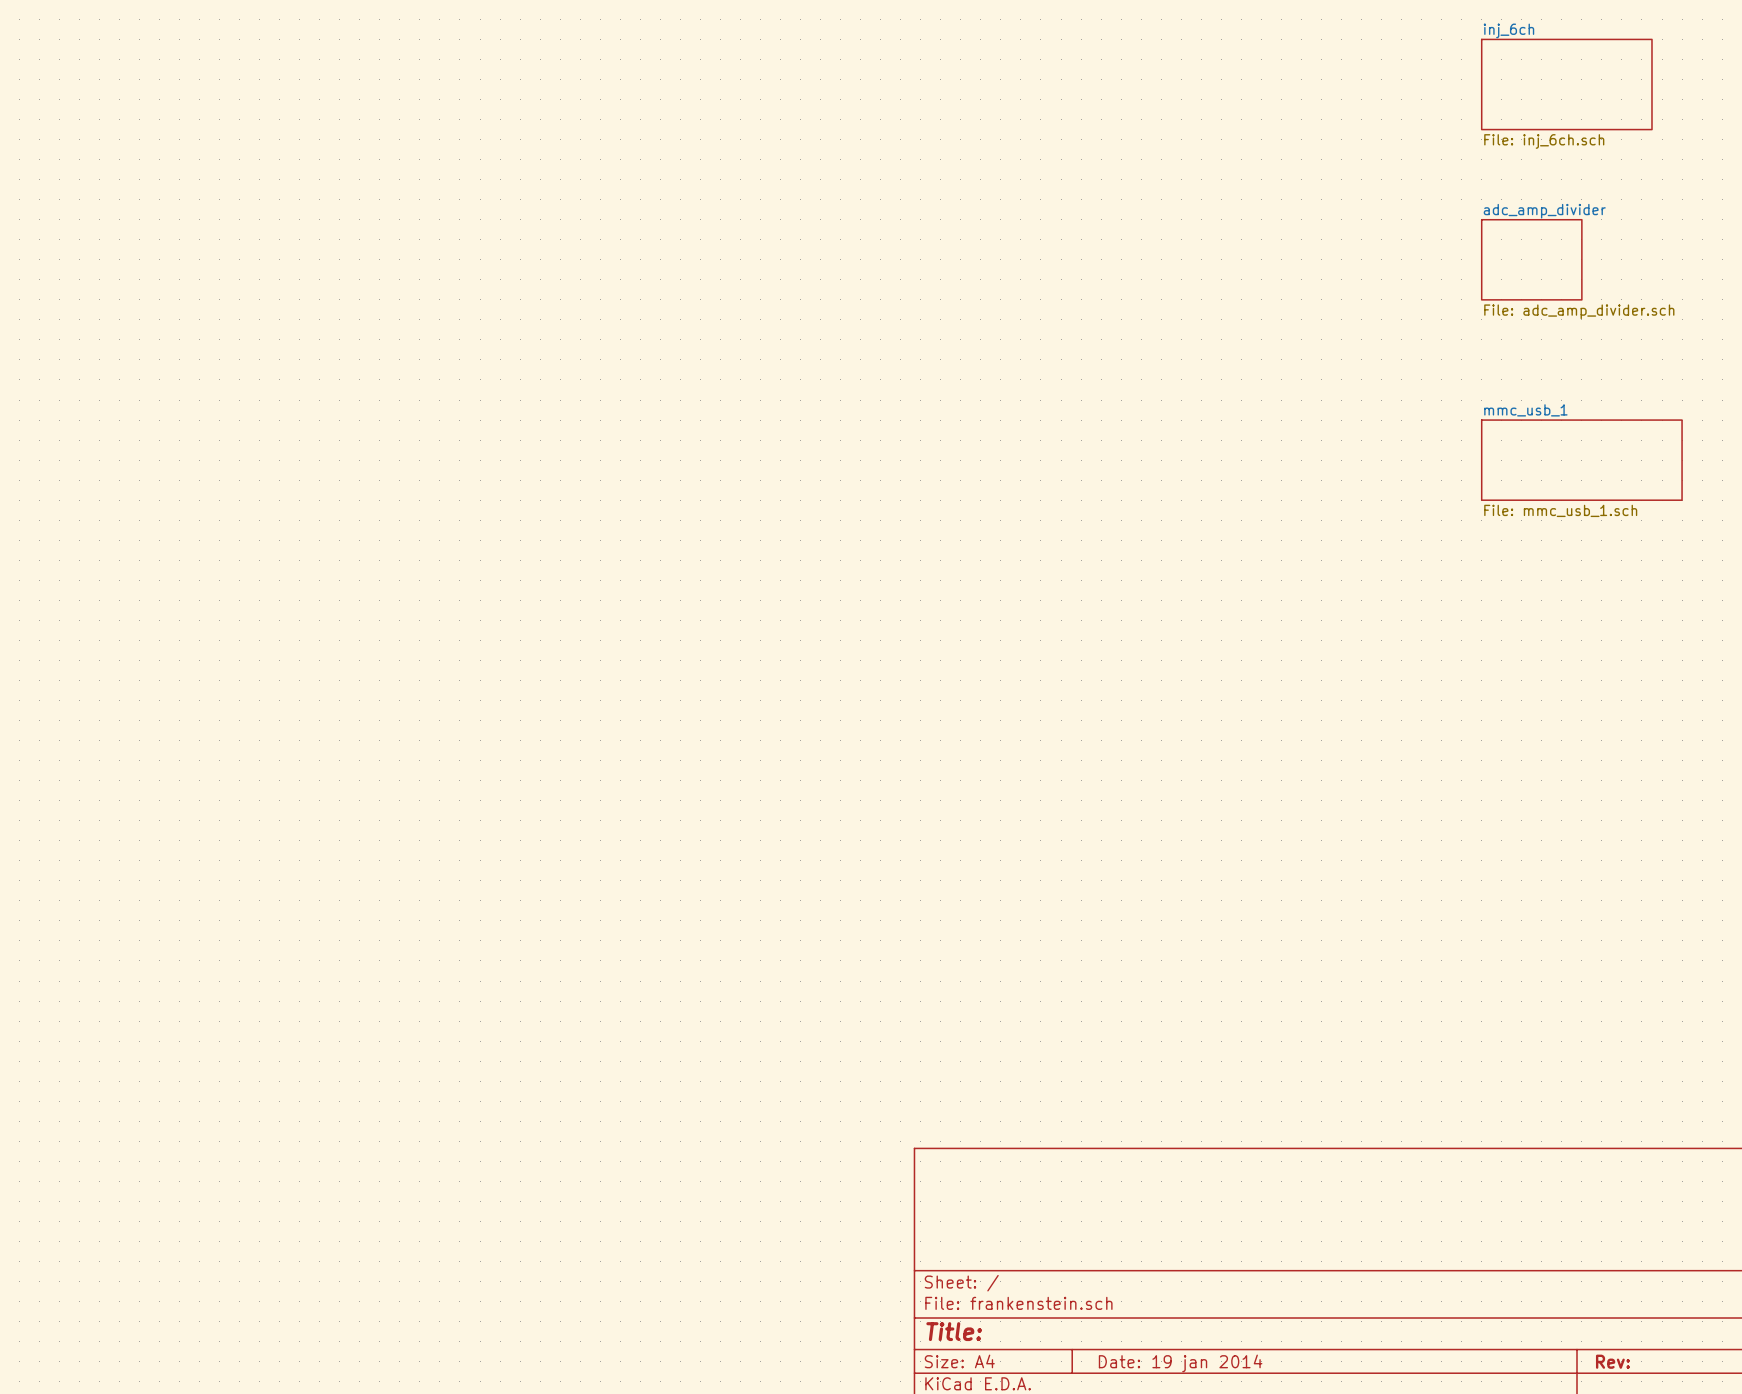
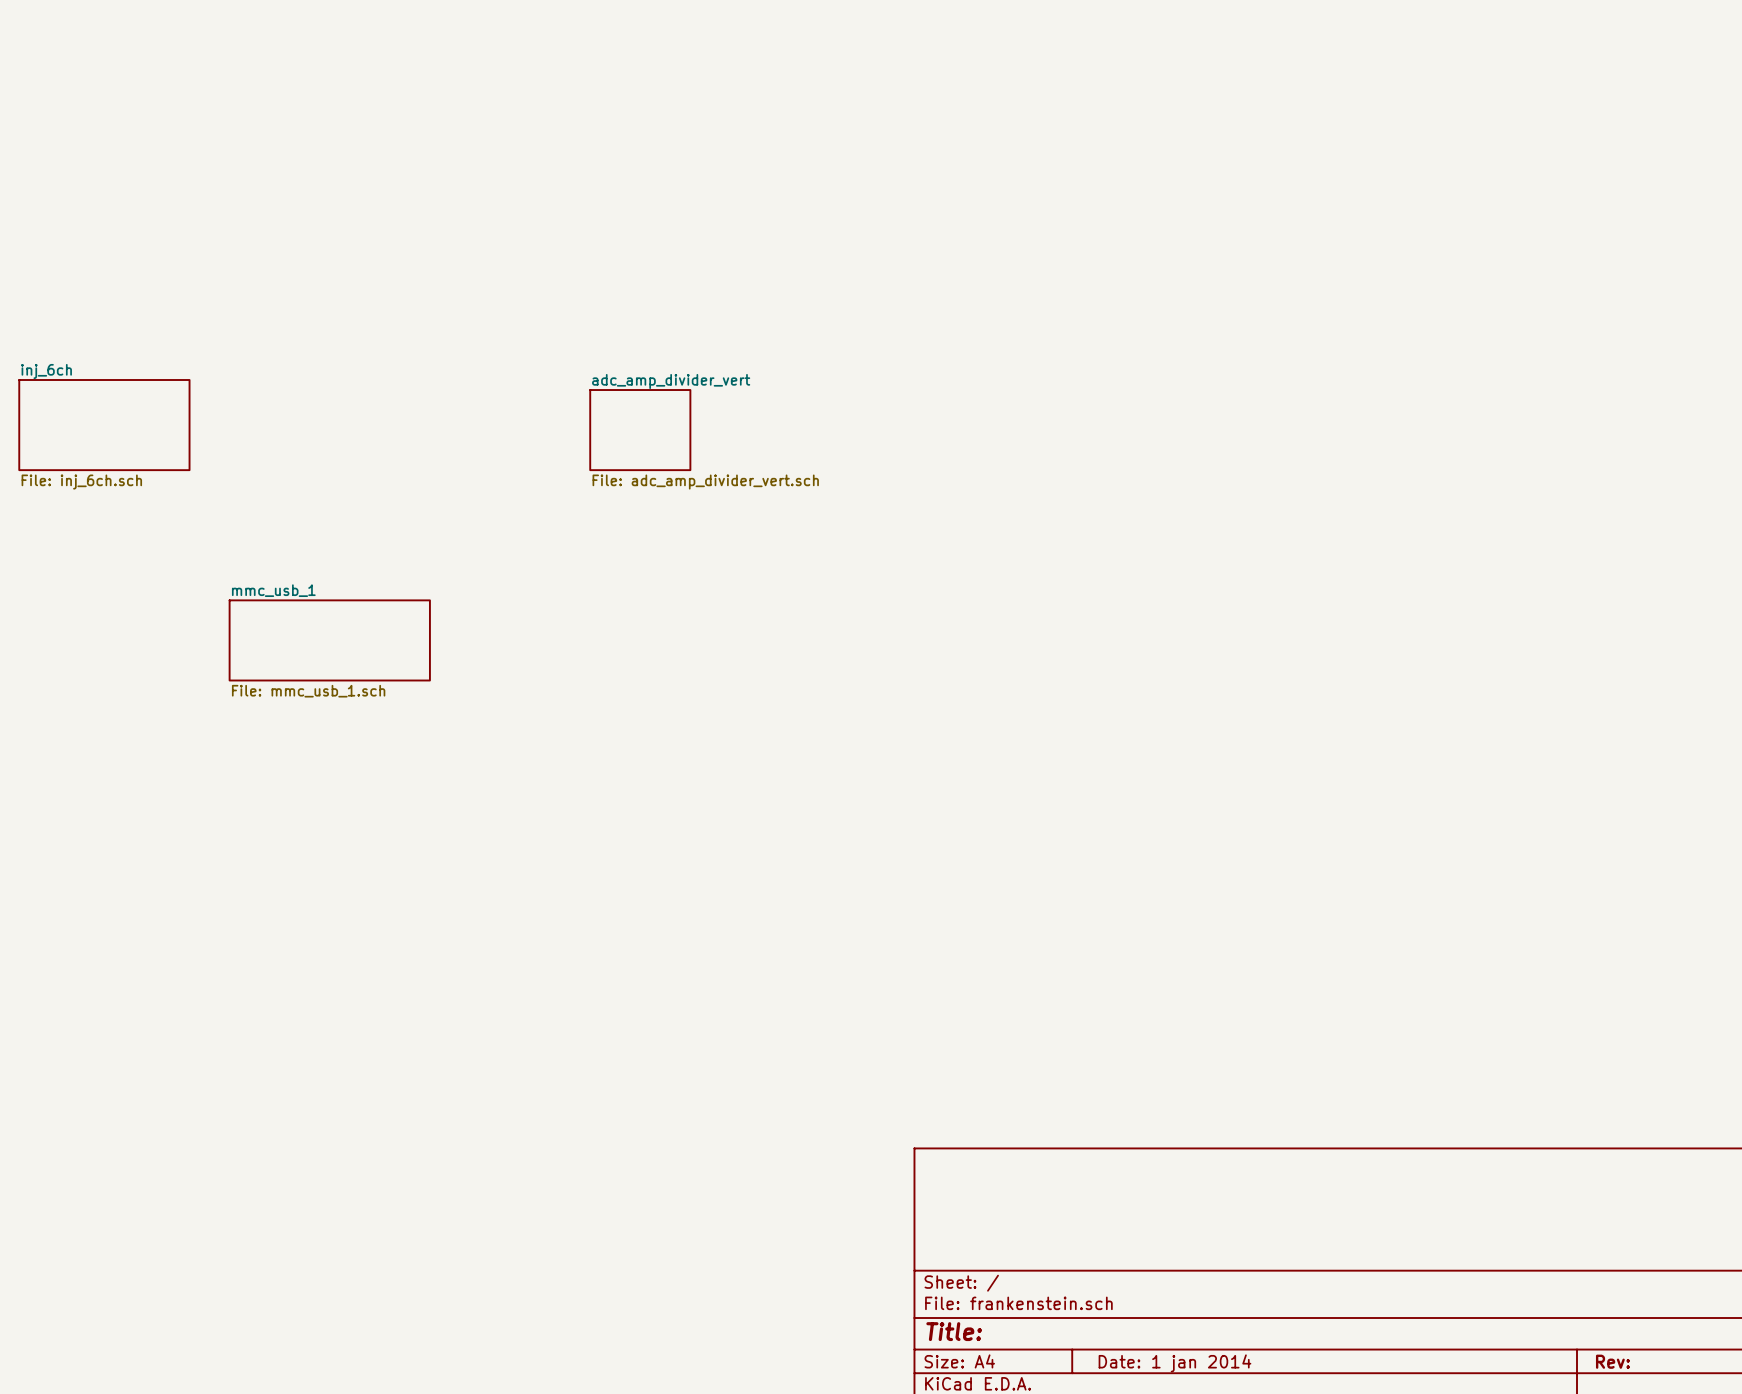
sheet inj_6ch position: (1566, 84) -> (104, 425)
sheet adc_amp_divider: File: adc_amp_divider.sch (1531, 259) -> none
sheet adc_amp_divider_vert: none -> File: adc_amp_divider_vert.sch (640, 430)
sheet mmc_usb_1 position: (1581, 460) -> (329, 640)
title block: Date: 19 jan 2014 (1180, 1363) -> Date: 1 jan 2014 (1174, 1363)

